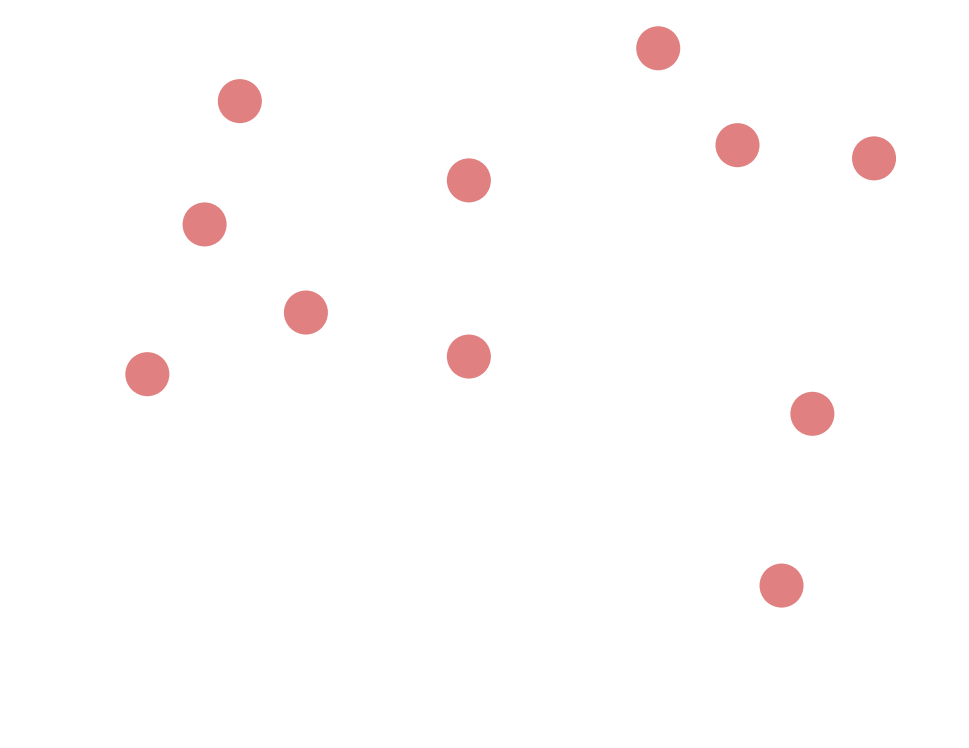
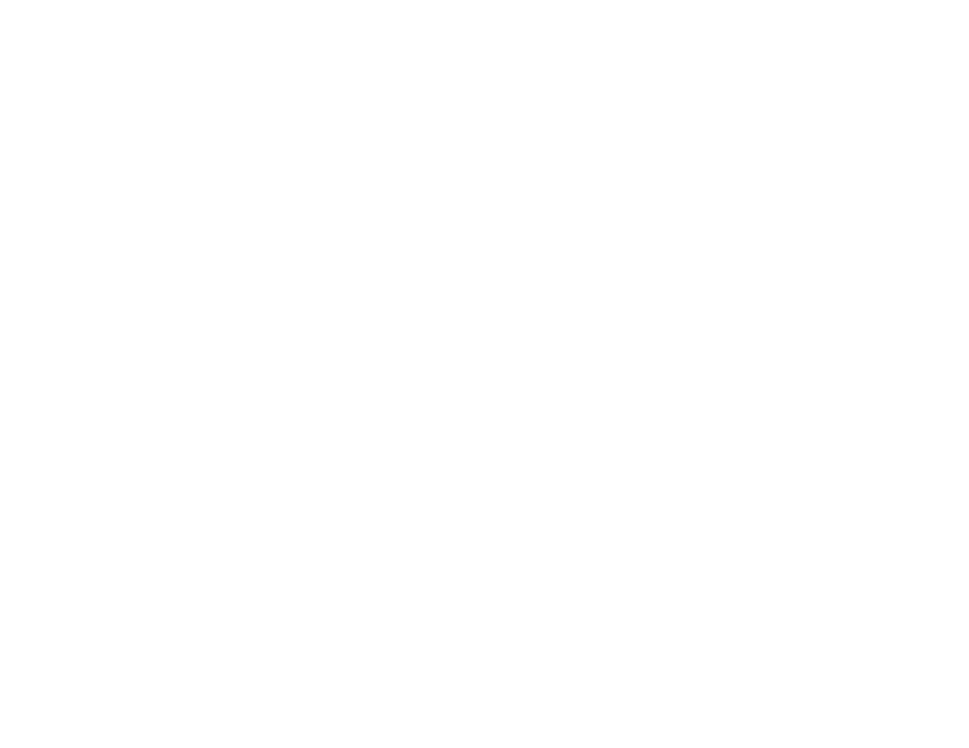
part: (658, 48) -> none
part: (239, 101) -> none
part: (737, 145) -> none
part: (874, 158) -> none
part: (468, 180) -> none
part: (204, 224) -> none
part: (305, 312) -> none
part: (468, 356) -> none
part: (147, 374) -> none
part: (812, 413) -> none
part: (781, 585) -> none

